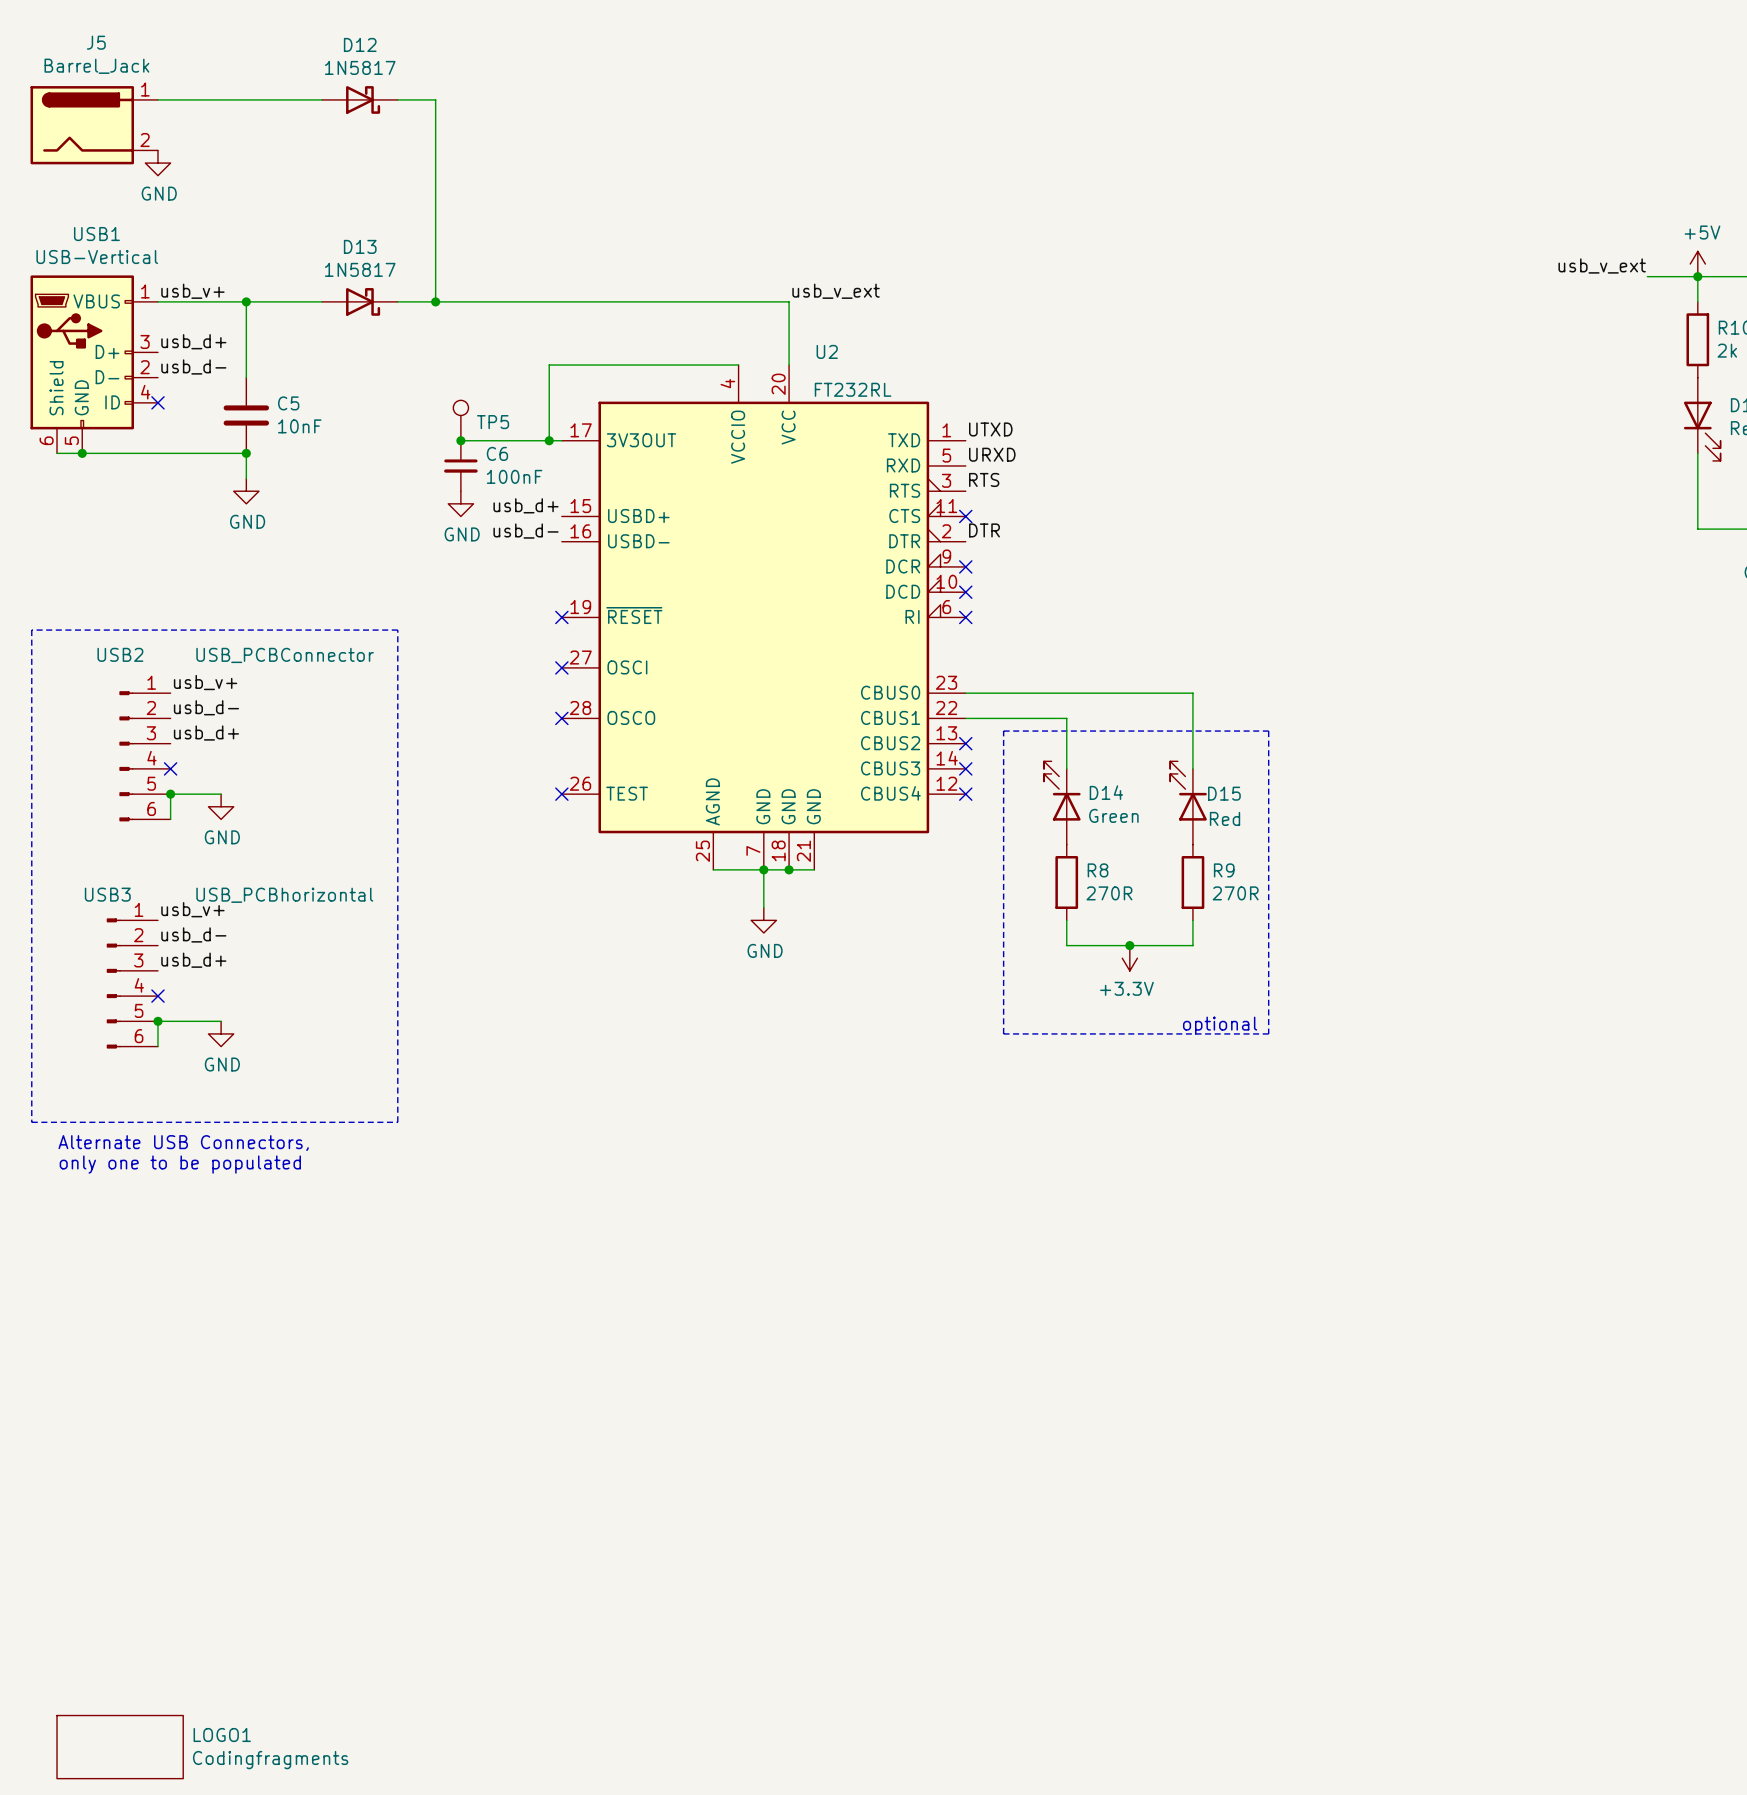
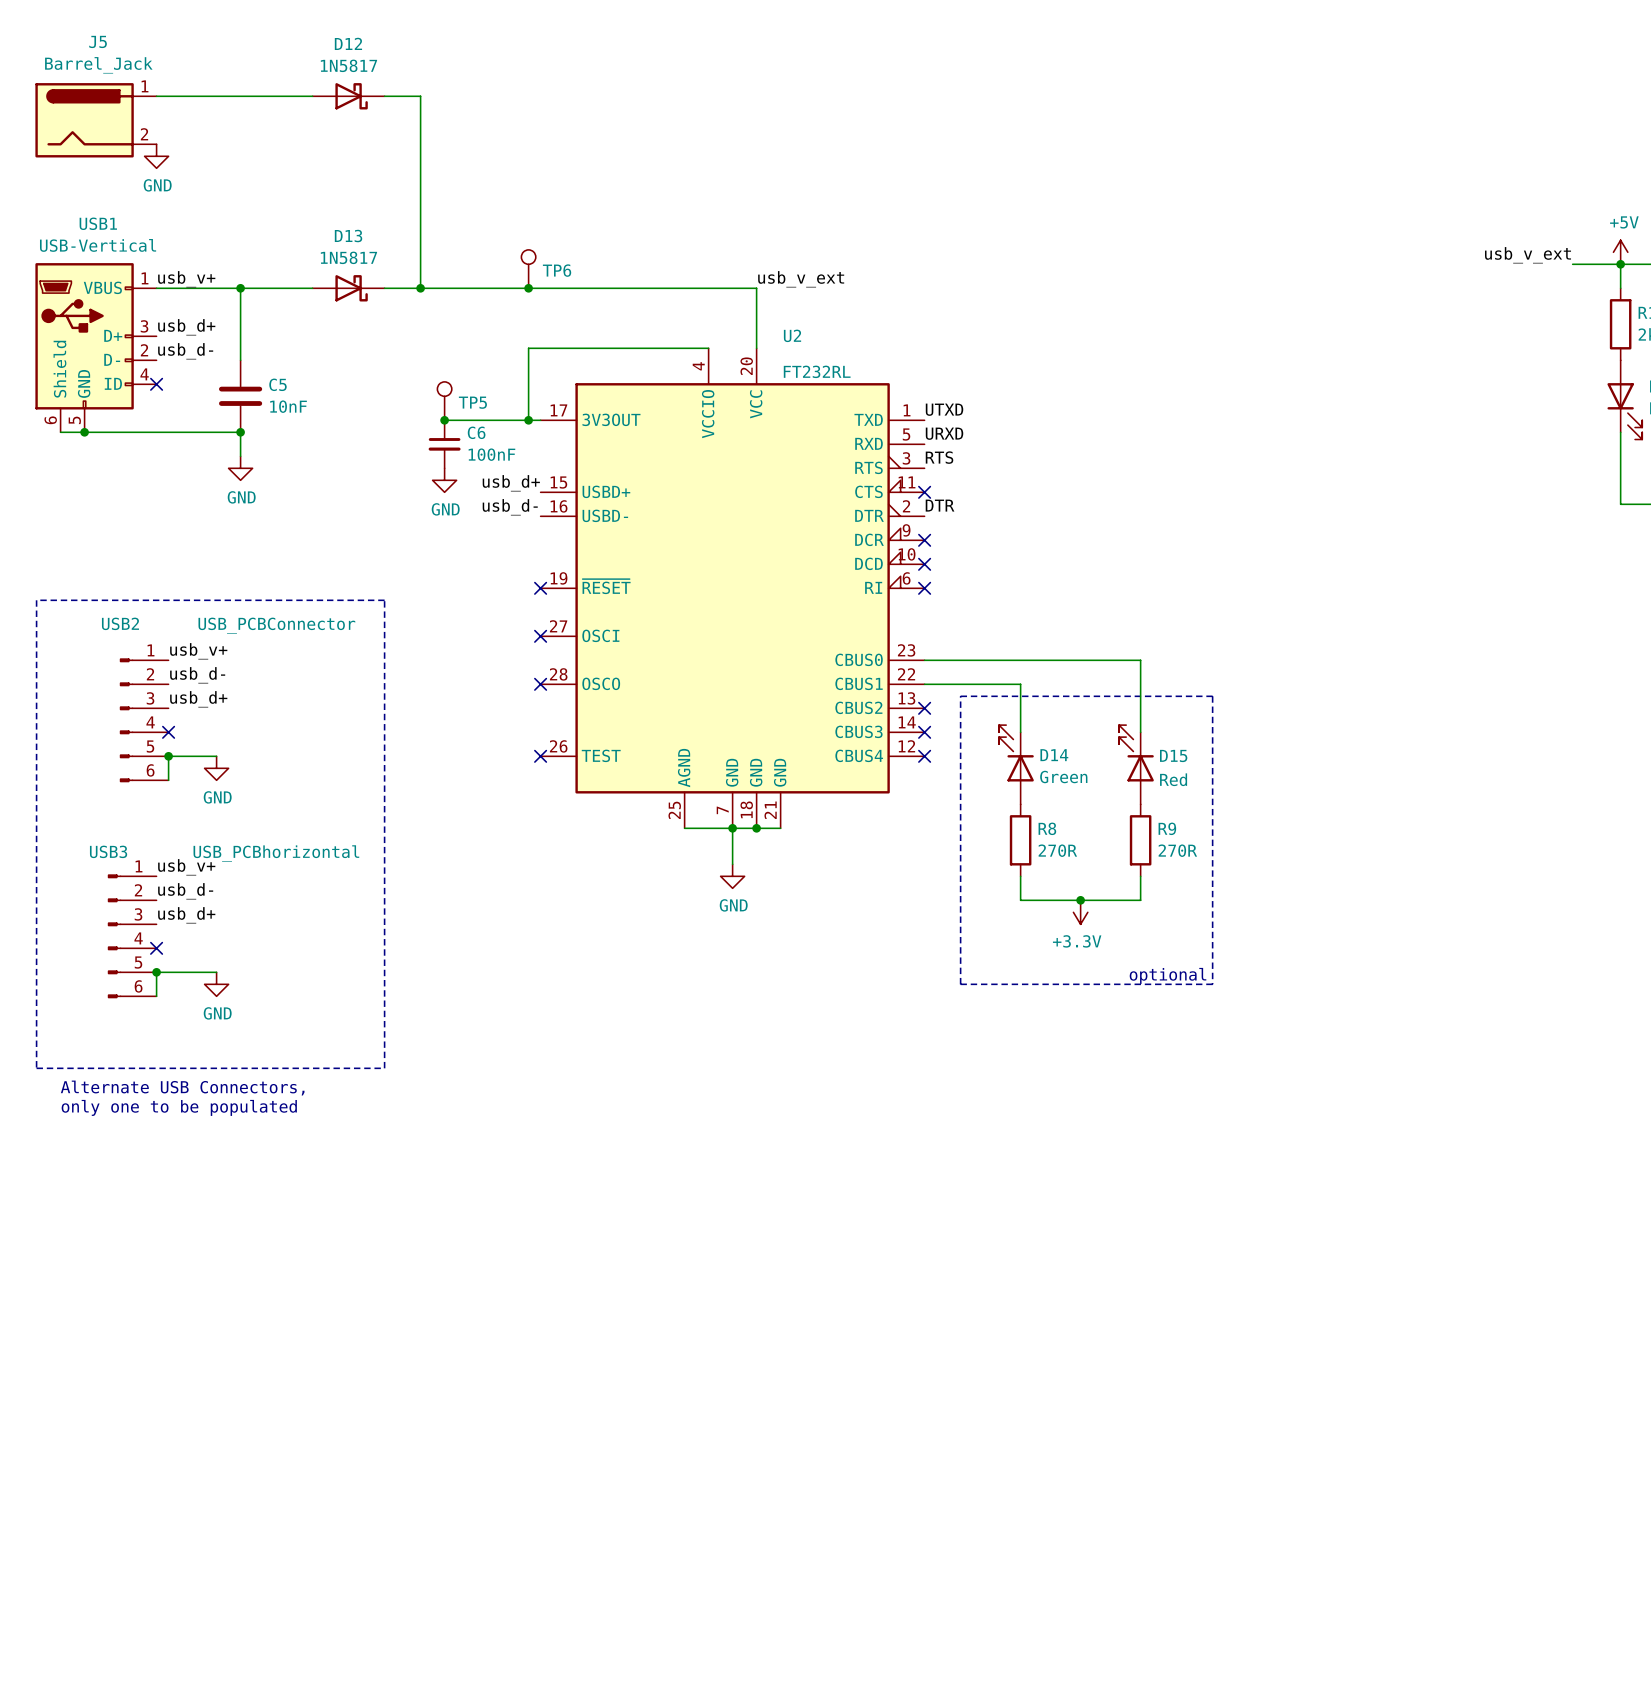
TP6: none -> (528, 269)
junction: none -> (528, 288)
LOGO1: Codingfragments (120, 1747) -> none

